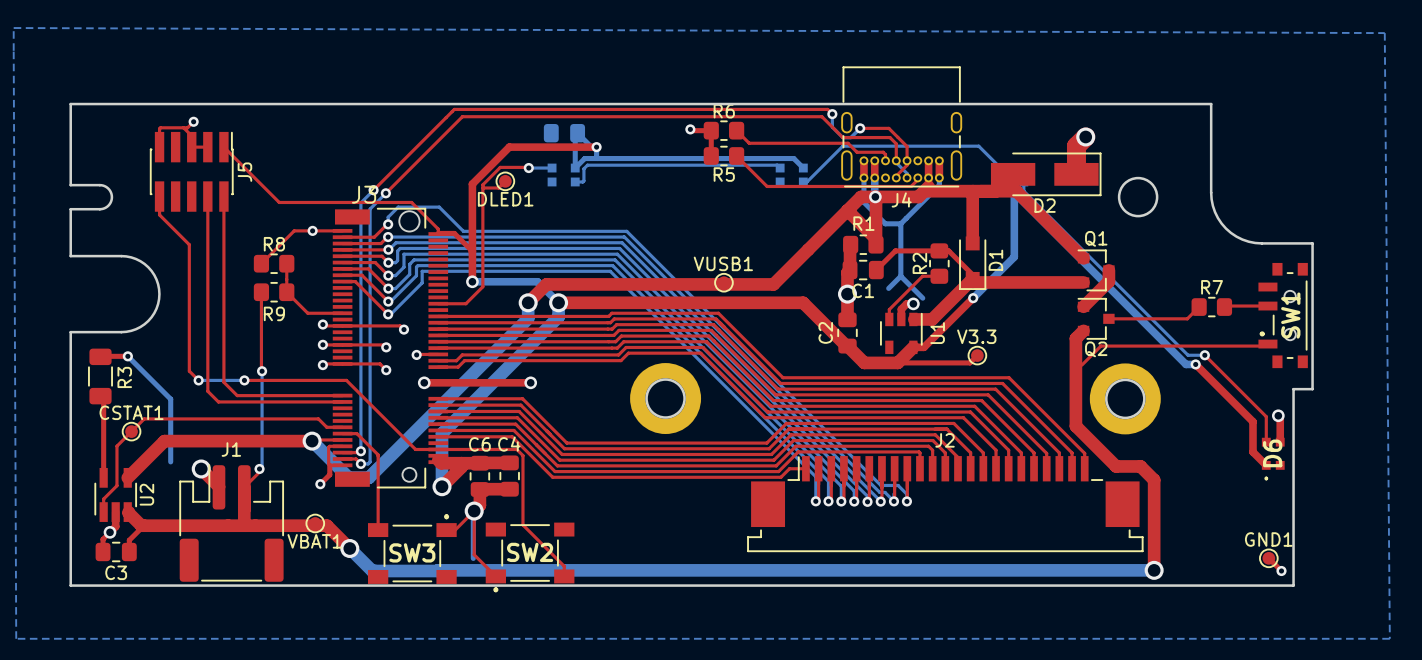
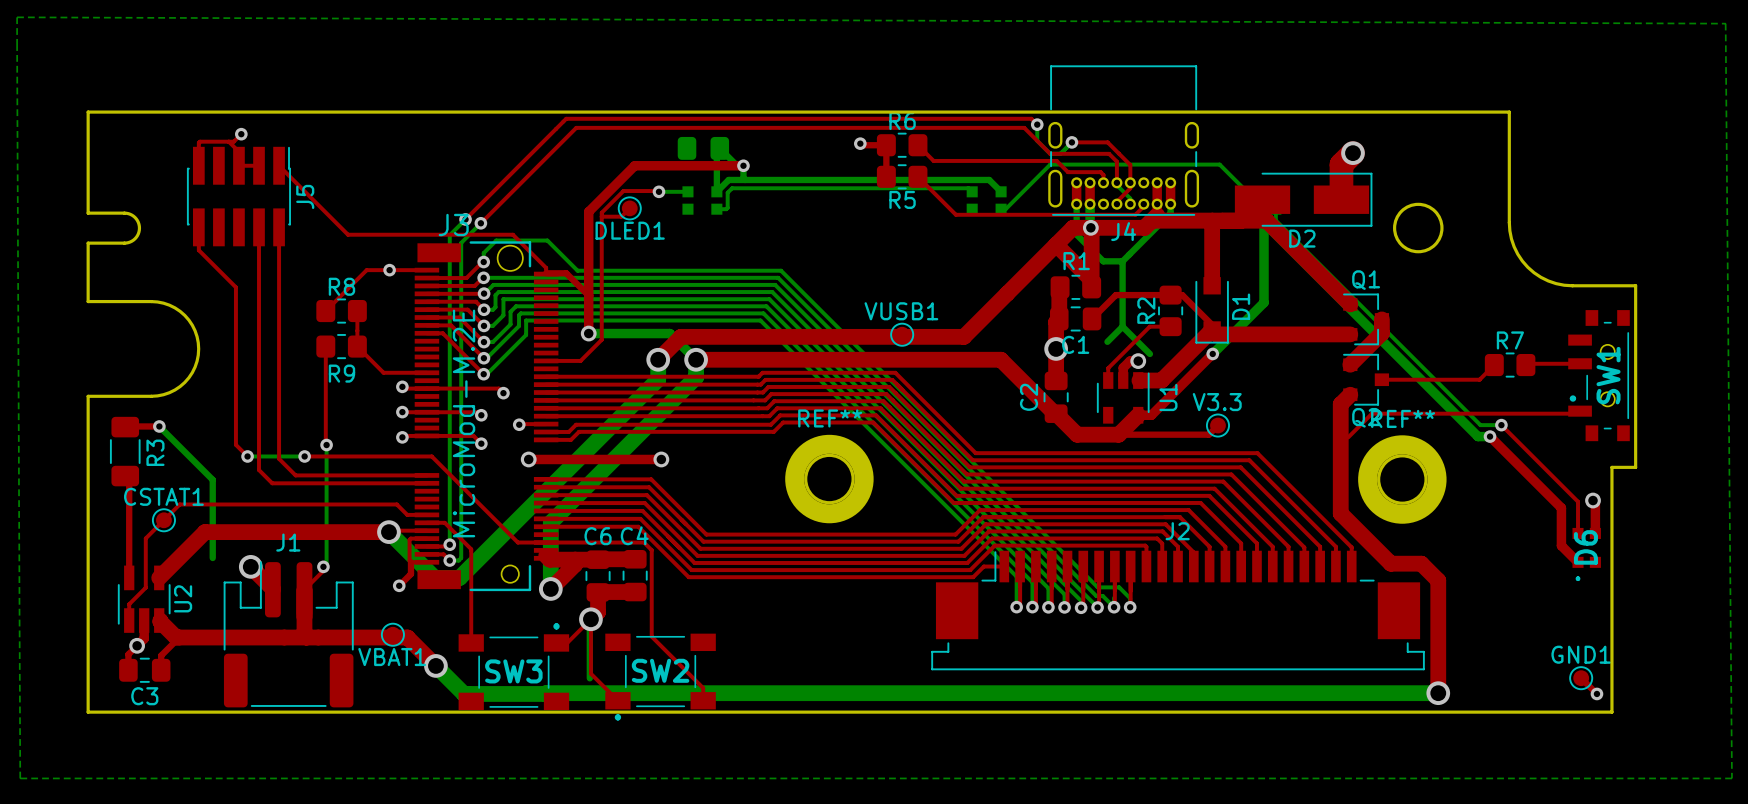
REF** name: none -> REF** (830, 418)
REF** name: none -> REF** (1403, 418)
J3 value: none -> MicroMod-M.2E (464, 423)

